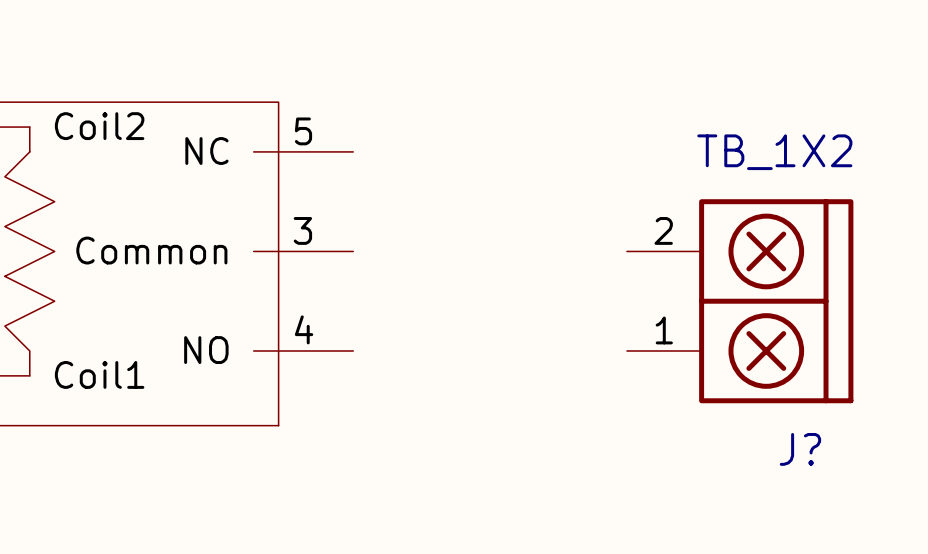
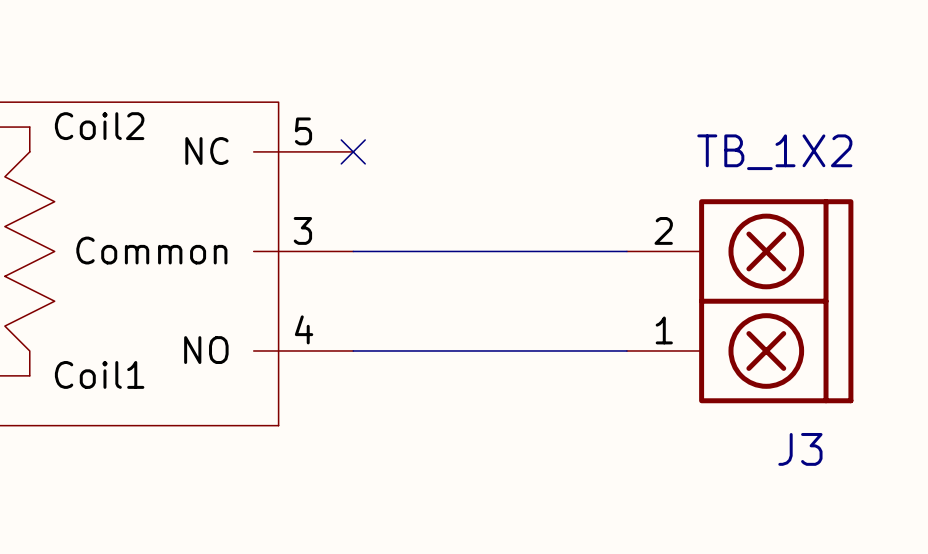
no-connect mark: none -> (353, 151)
wire: none -> (353, 251) (626, 251)
wire: none -> (353, 350) (626, 350)
J? name: J? (800, 449) -> J3 (800, 449)

